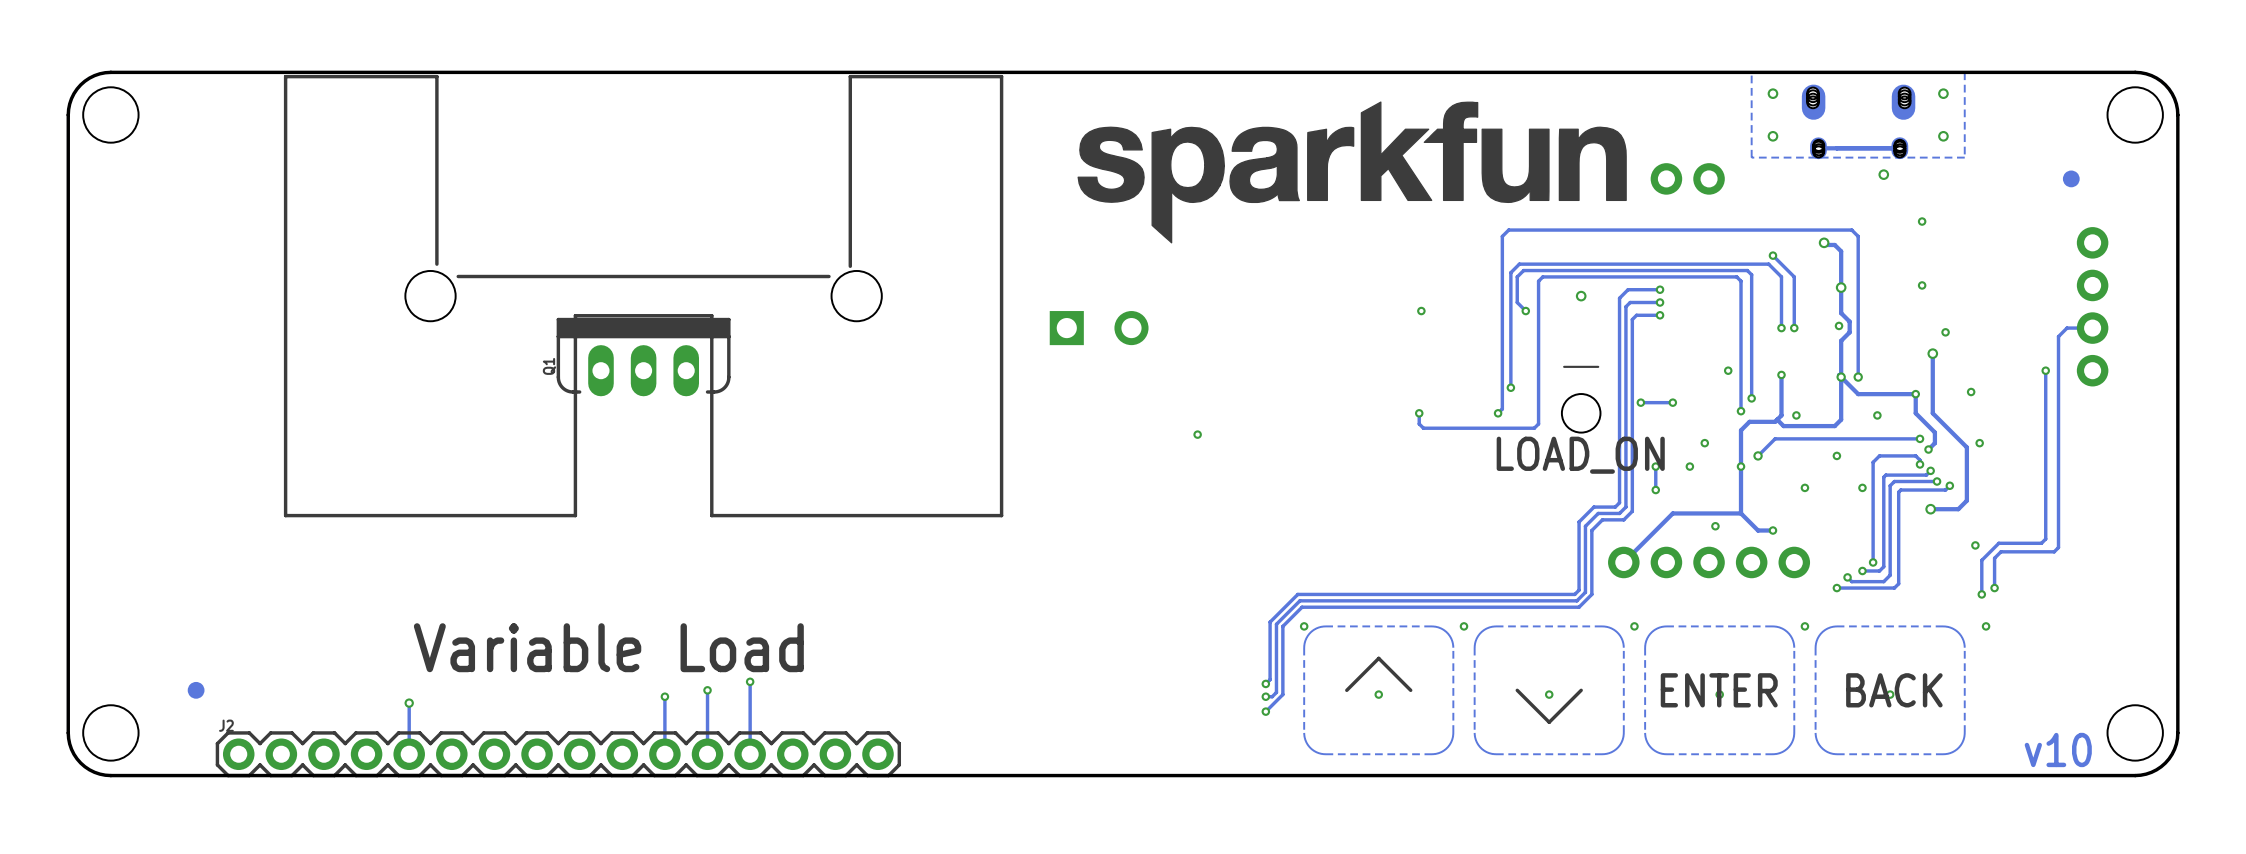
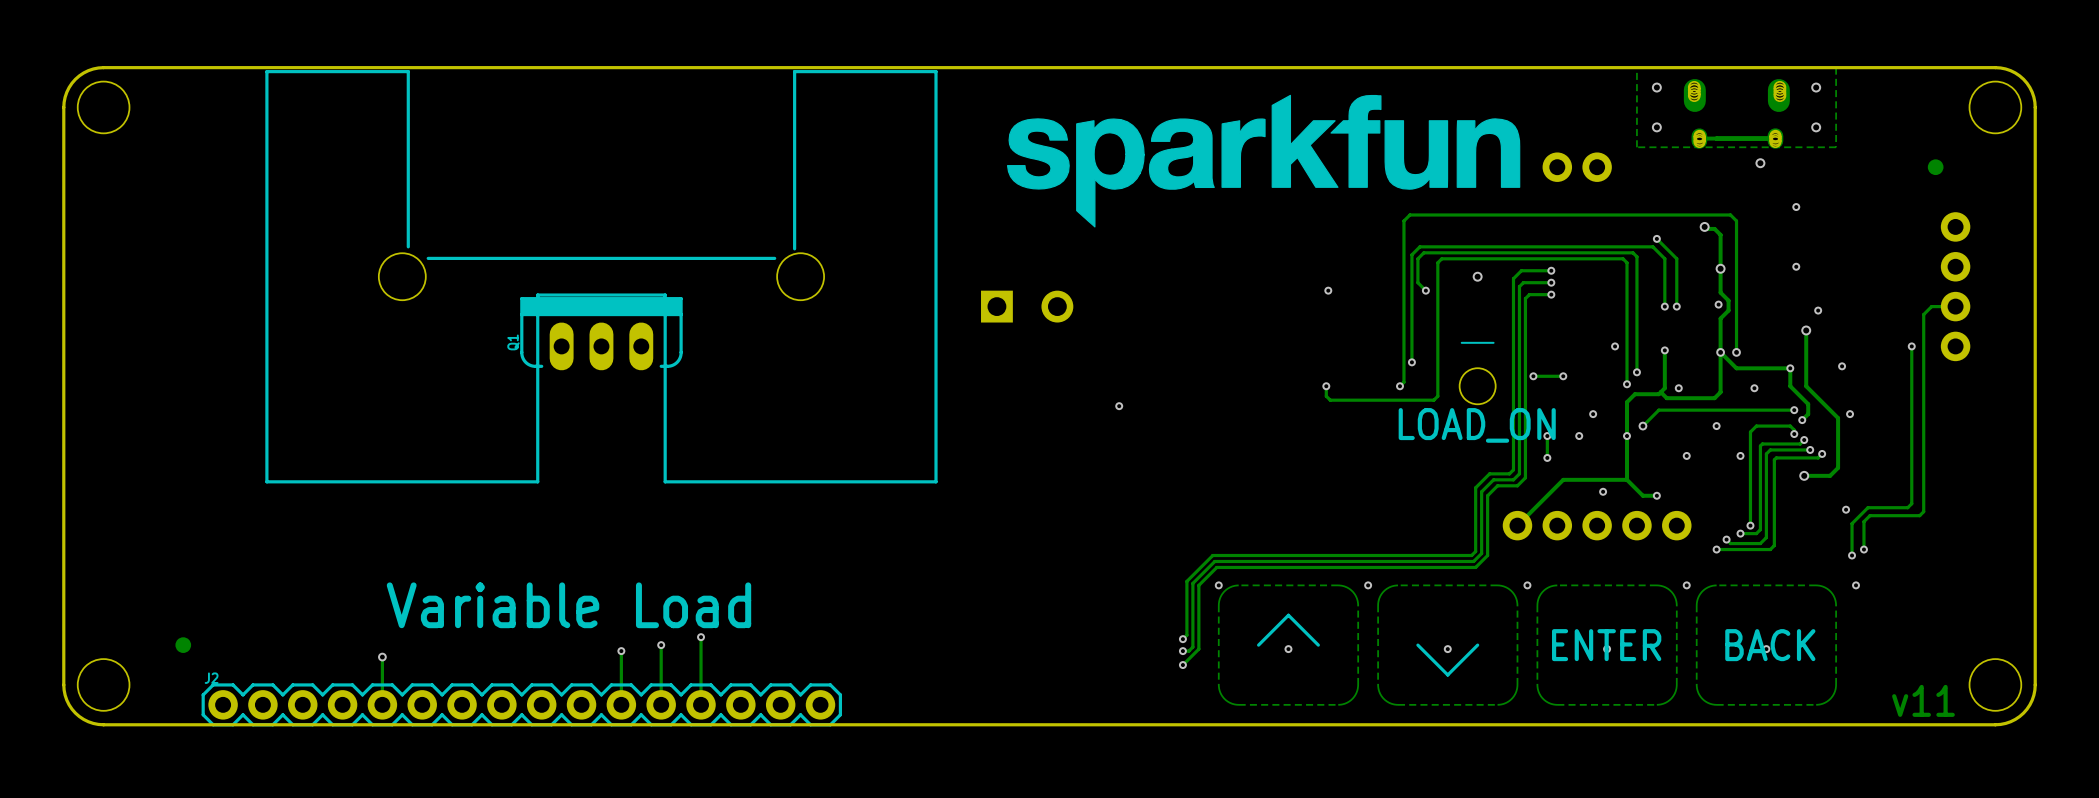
text: v10 (2058, 749) -> v11 (1923, 700)

